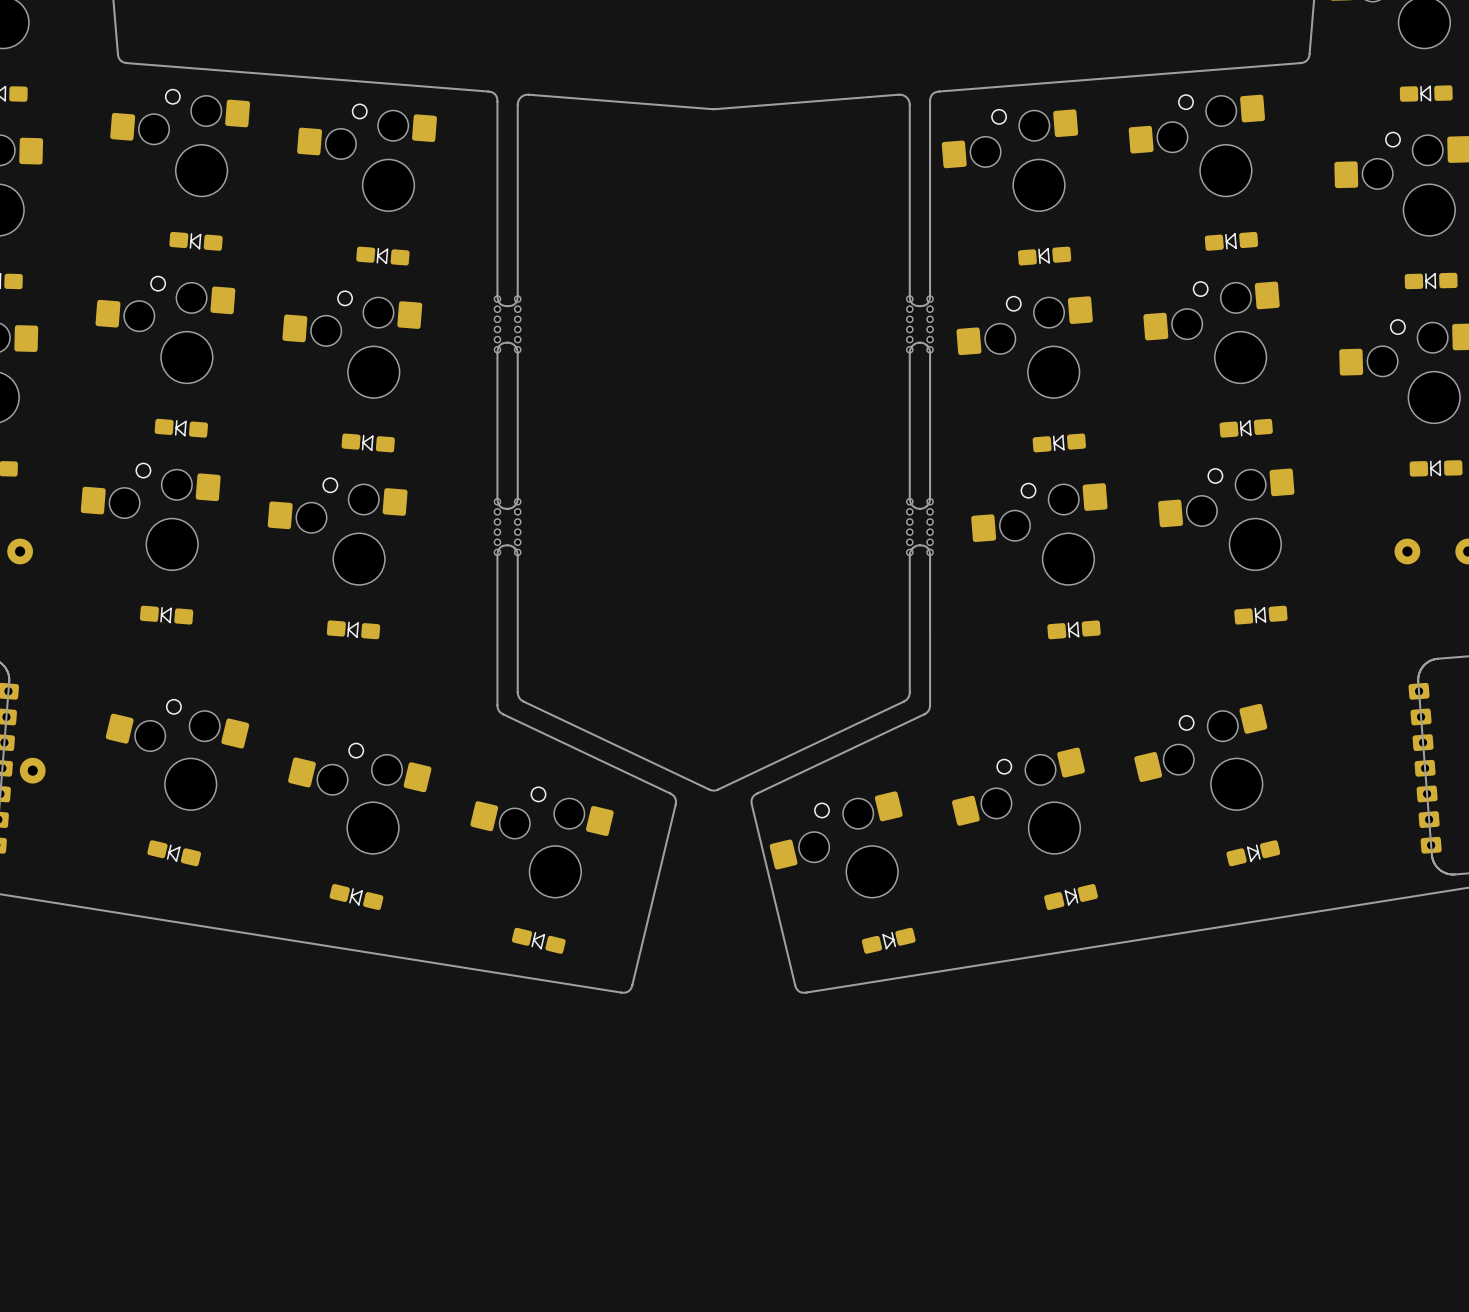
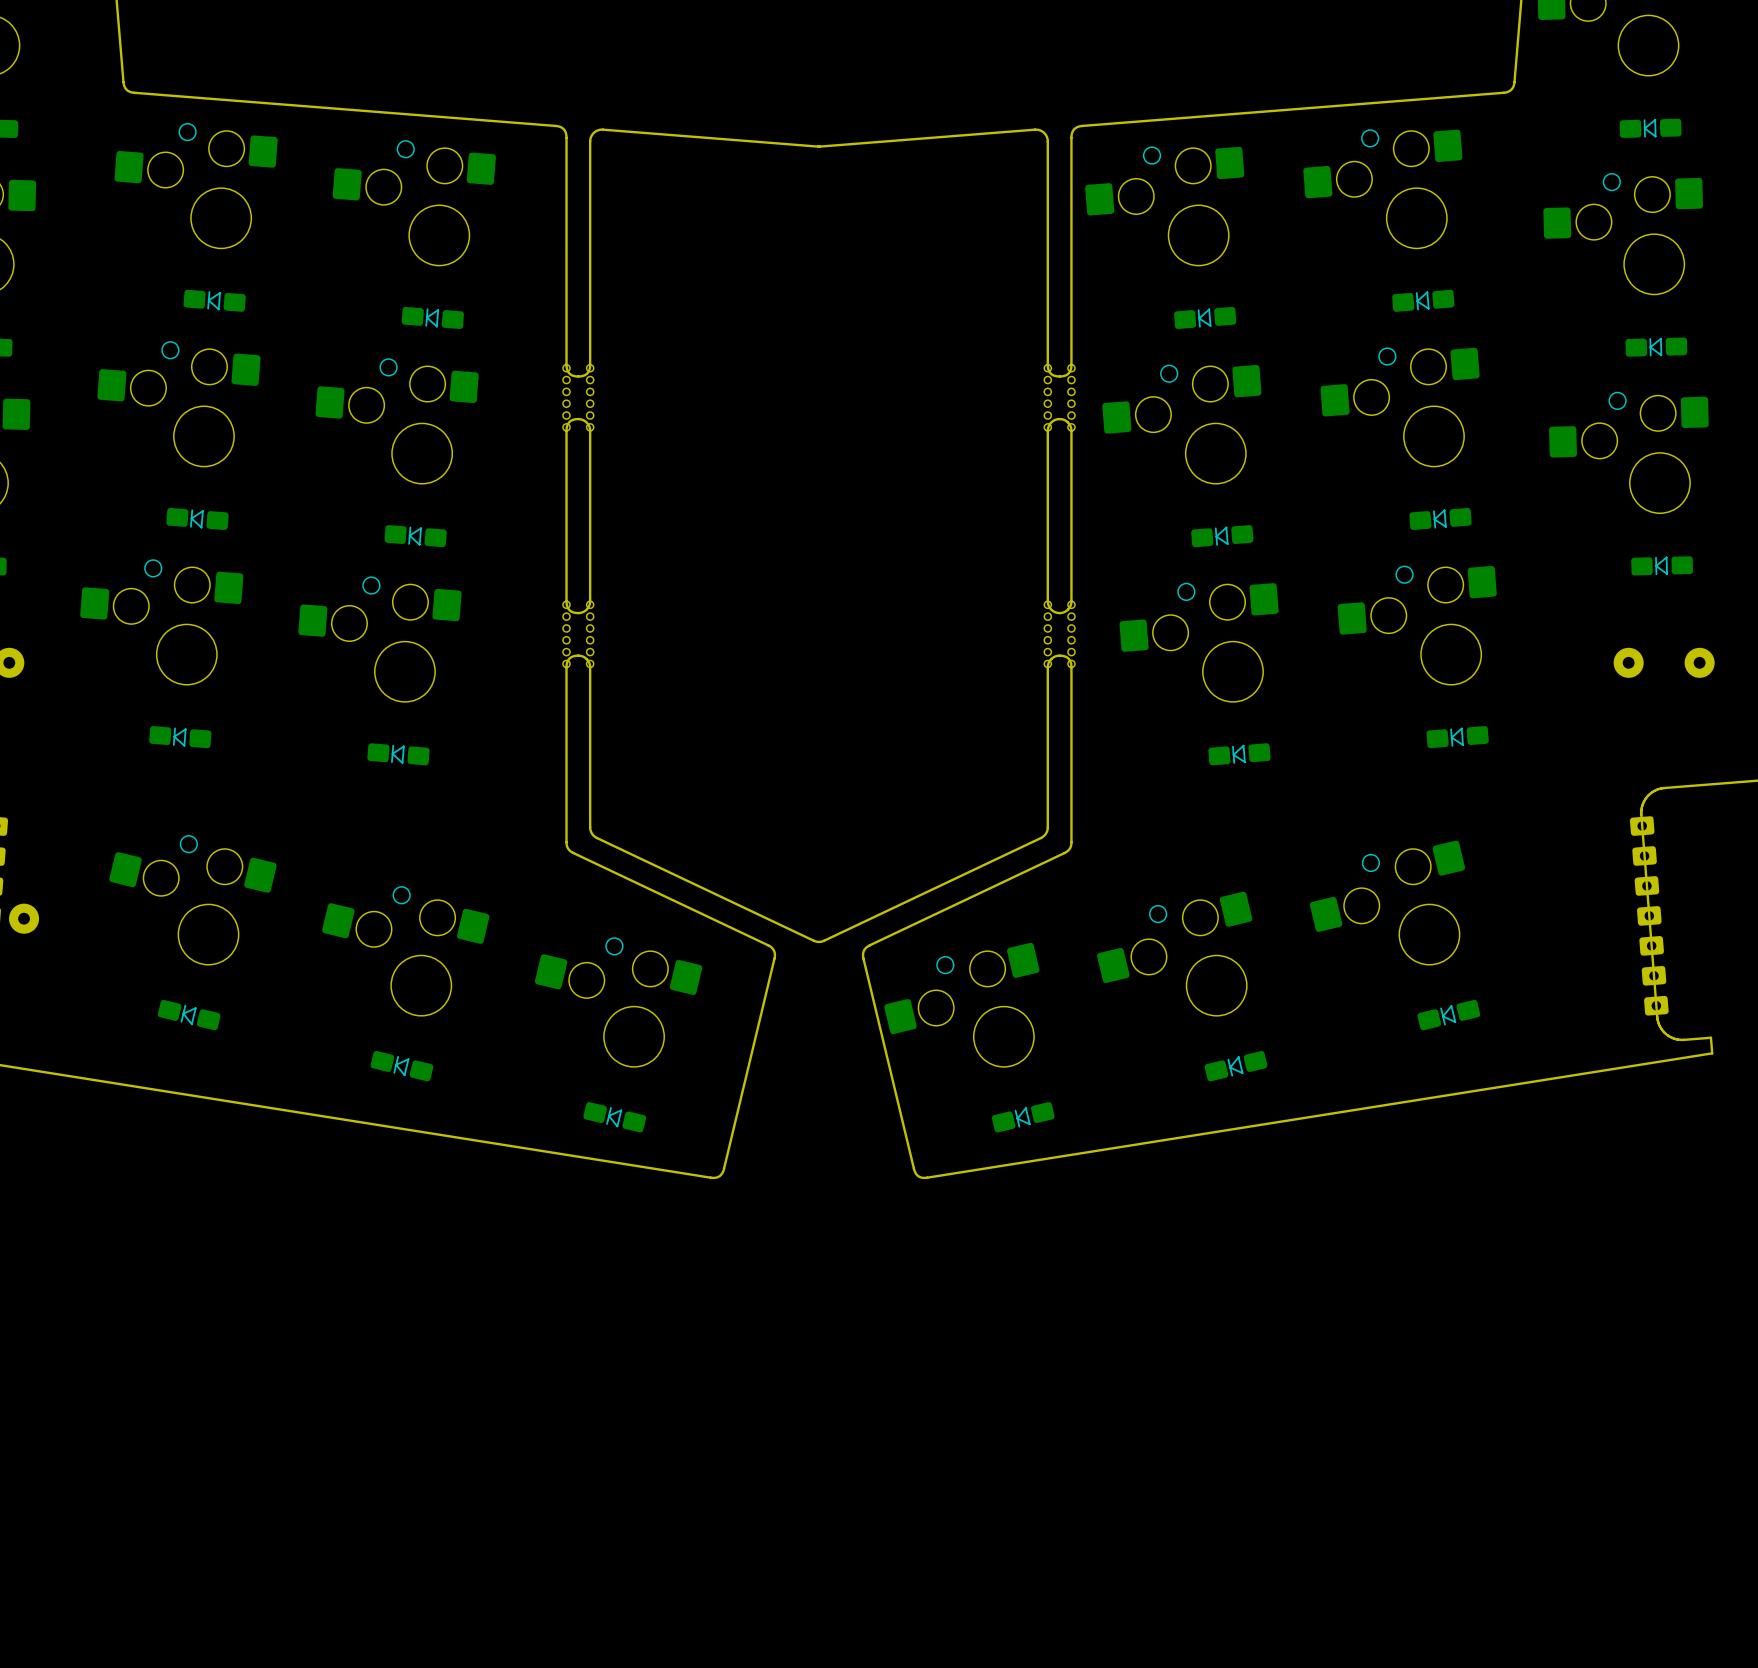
part rotation: 0° (1253, 853) -> 180° (1448, 1015)
part rotation: 0° (1071, 897) -> 180° (1236, 1066)
part rotation: 0° (888, 940) -> 180° (1023, 1117)

